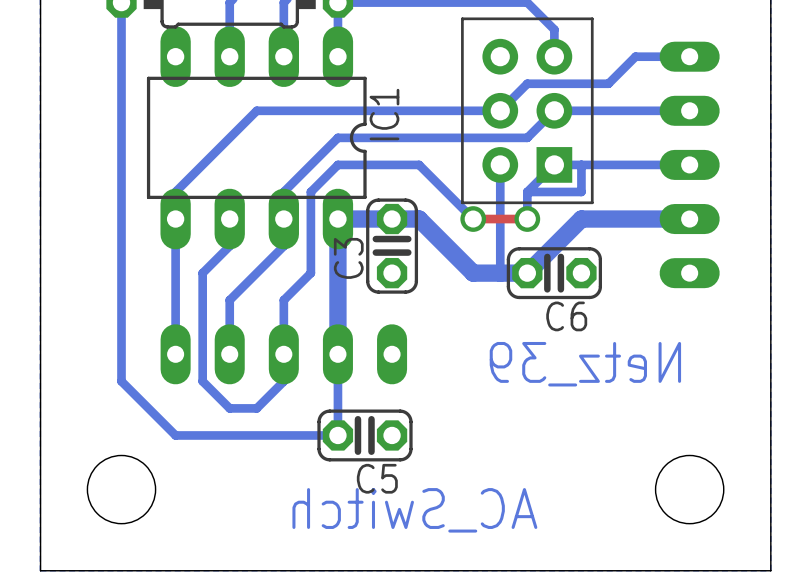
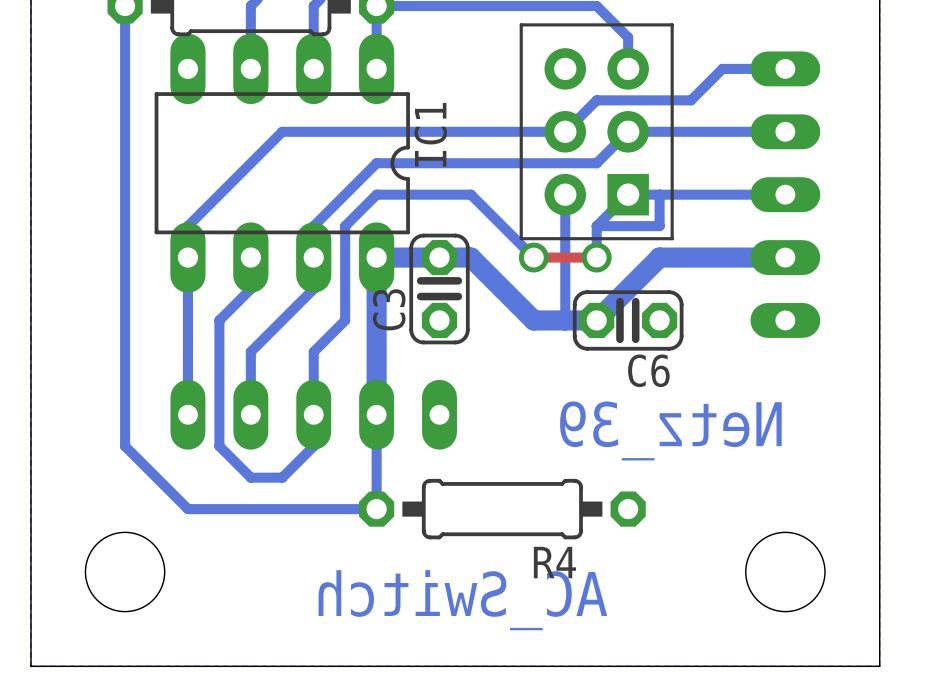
C5: (365, 435) -> none
R4: none -> (502, 509)

